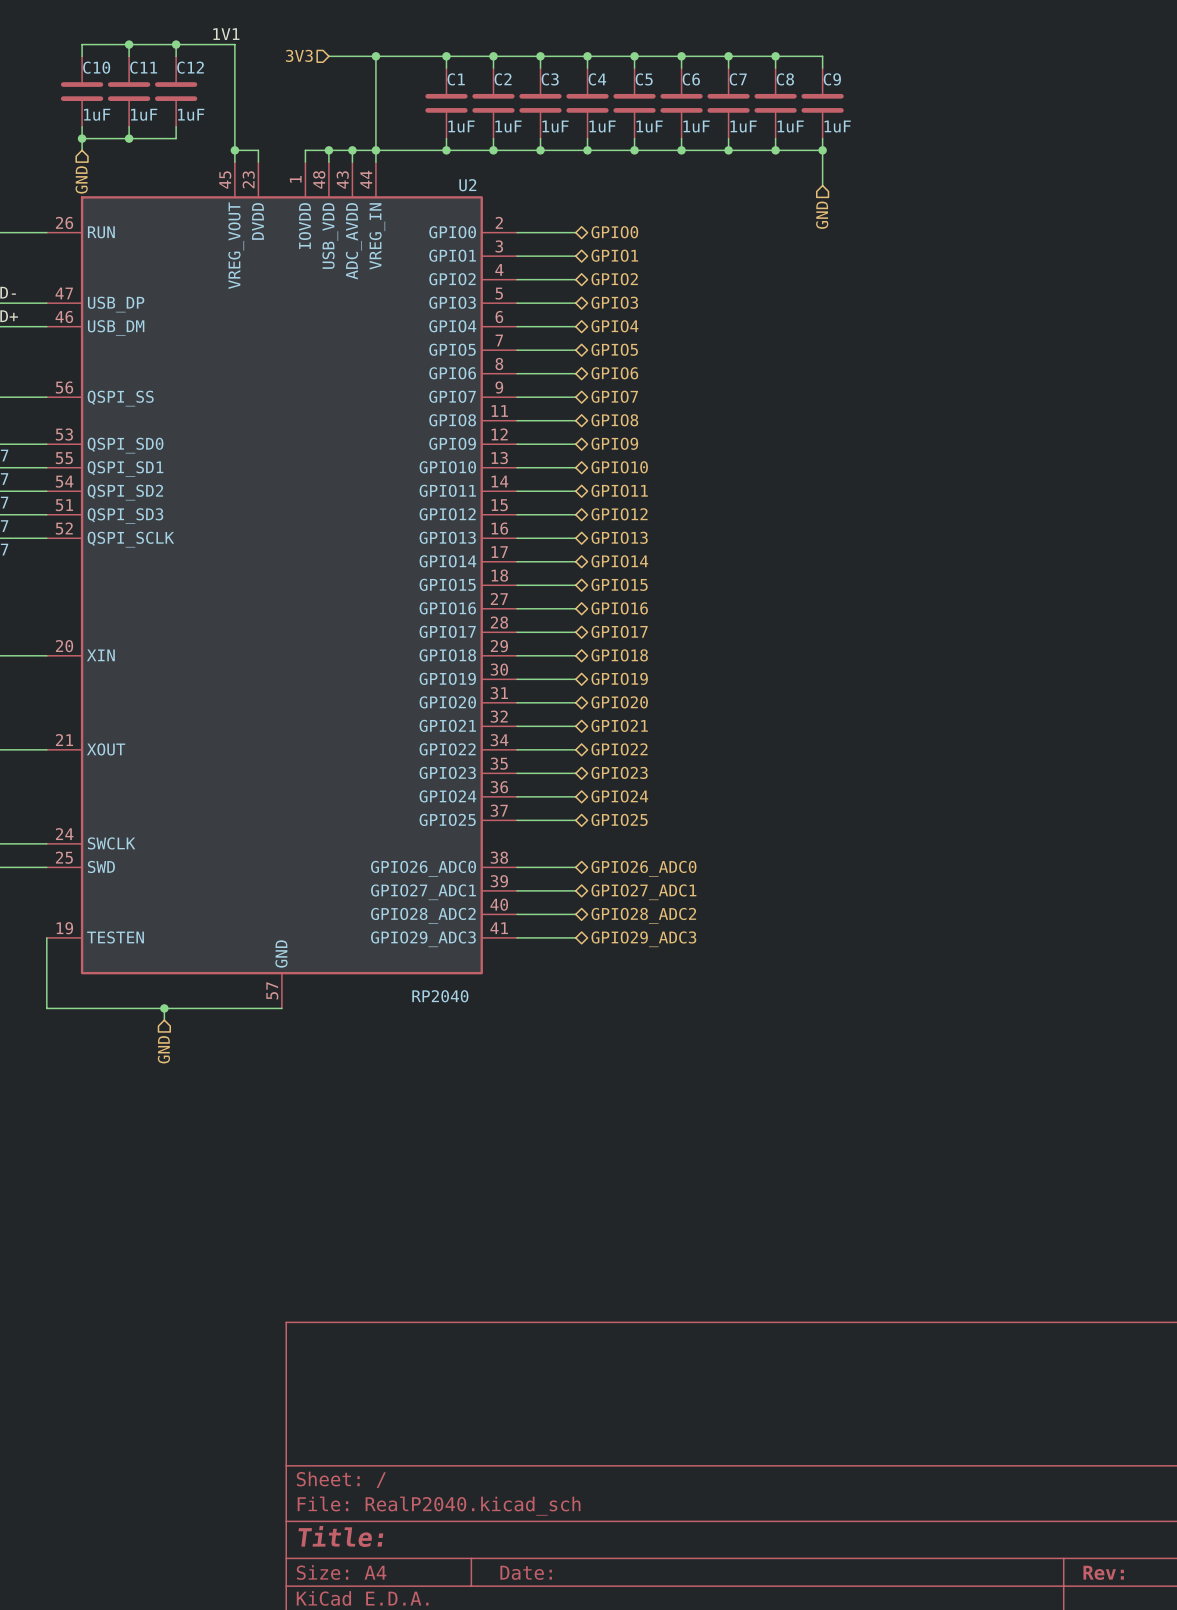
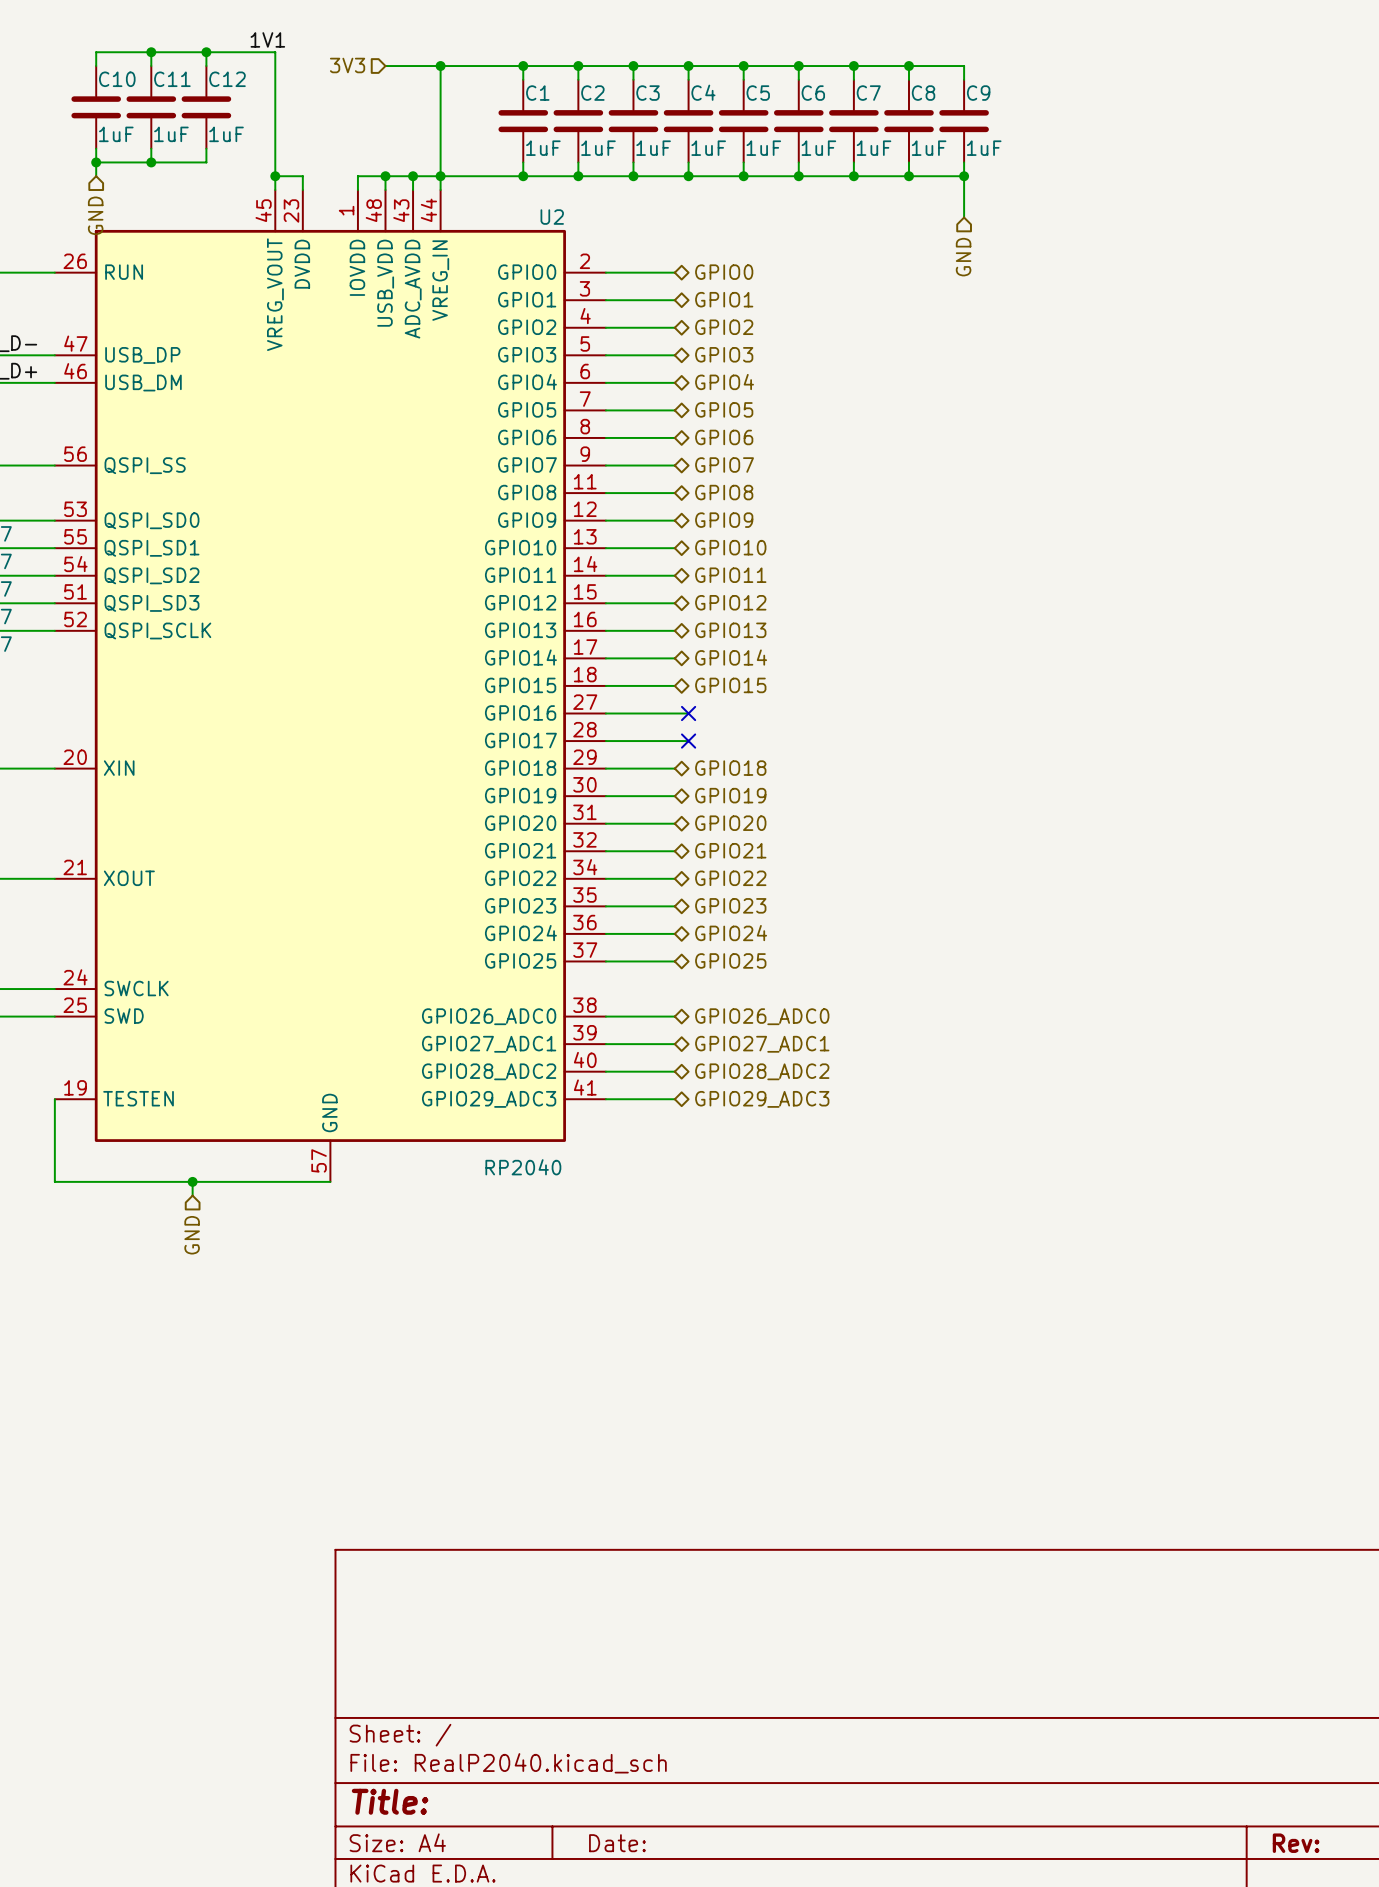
wire: none -> (674, 713) (688, 713)
no-connect mark: none -> (688, 713)
hierarchical label: GPIO16 (619, 608) -> none
hierarchical label: GPIO17 (619, 631) -> none
wire: none -> (674, 741) (688, 741)
no-connect mark: none -> (688, 741)

